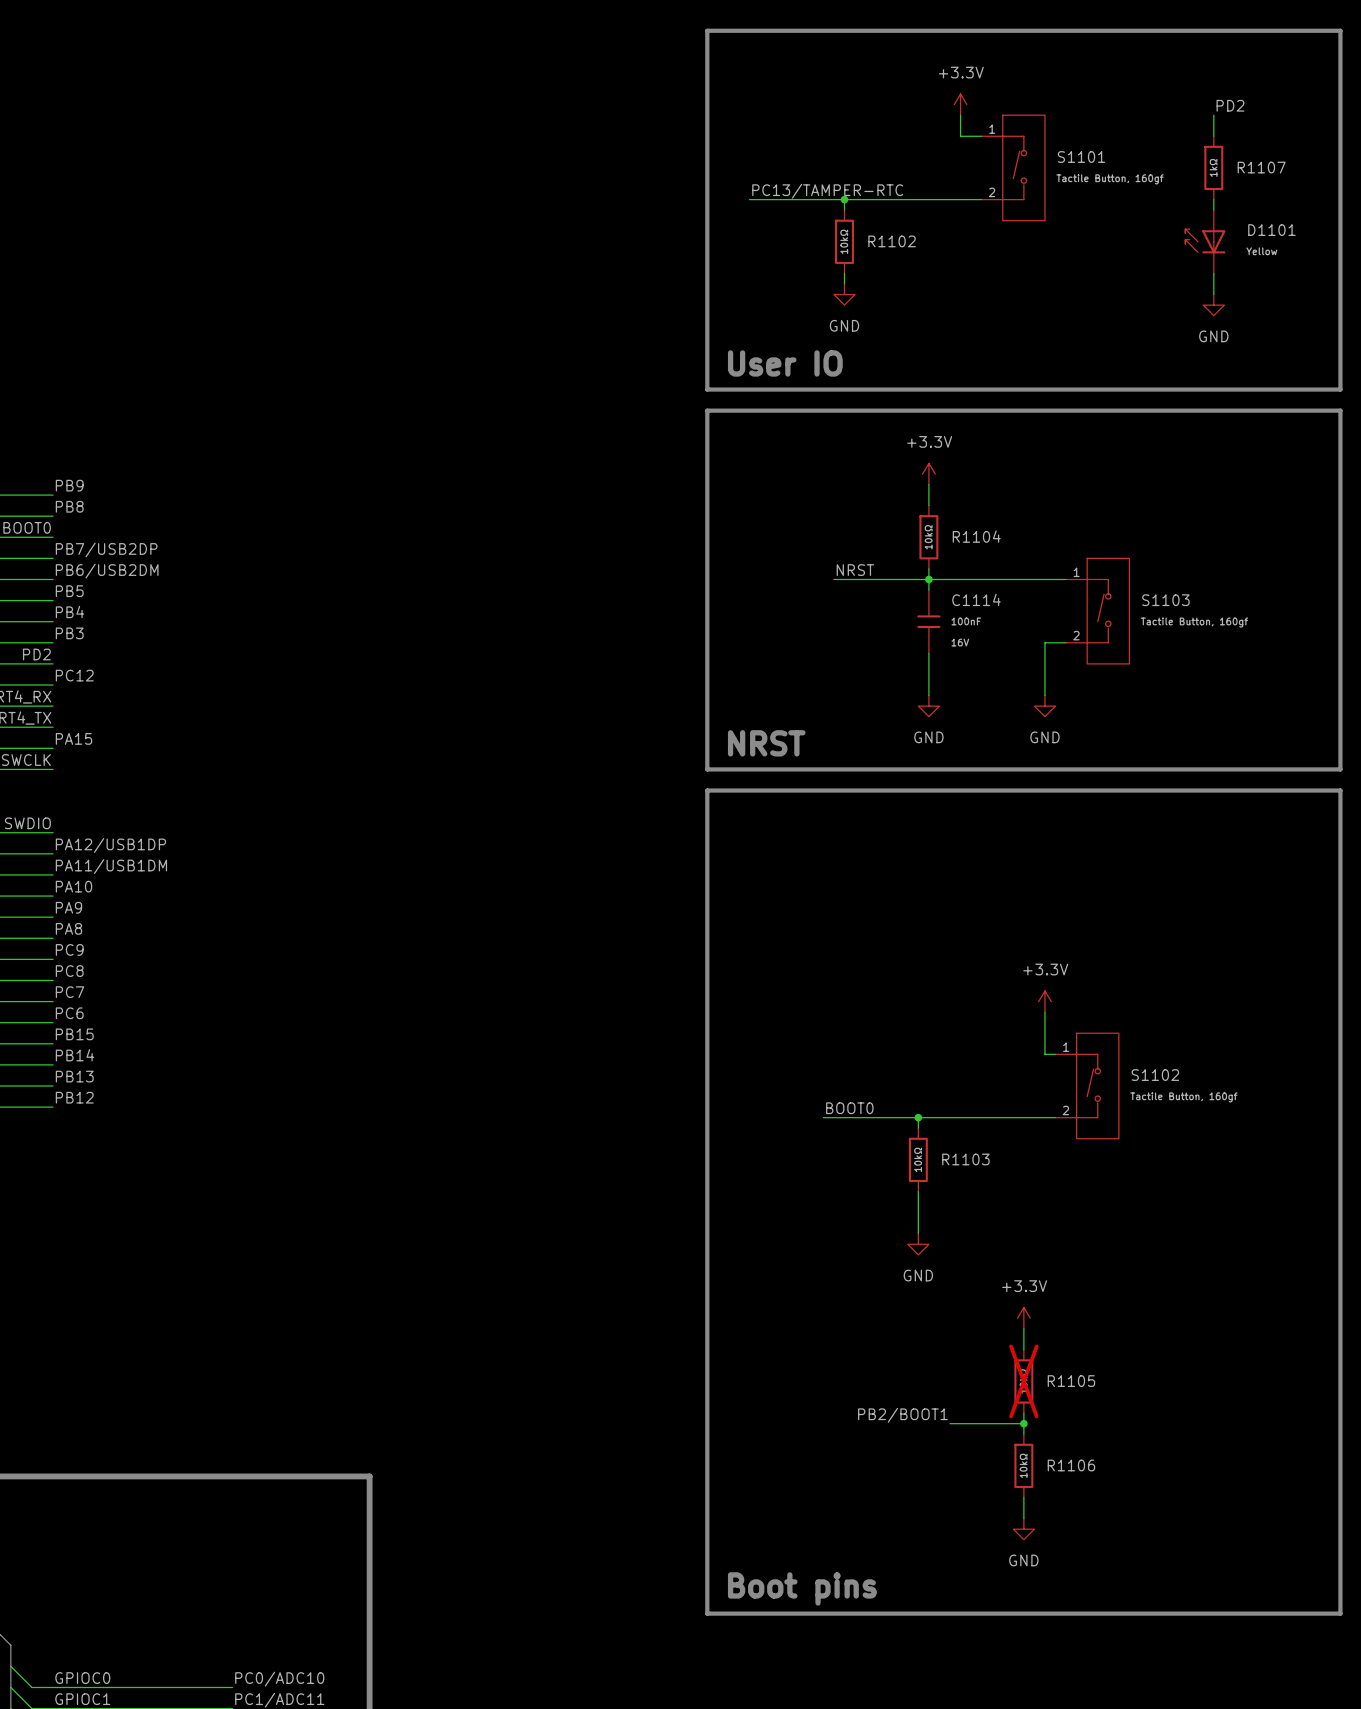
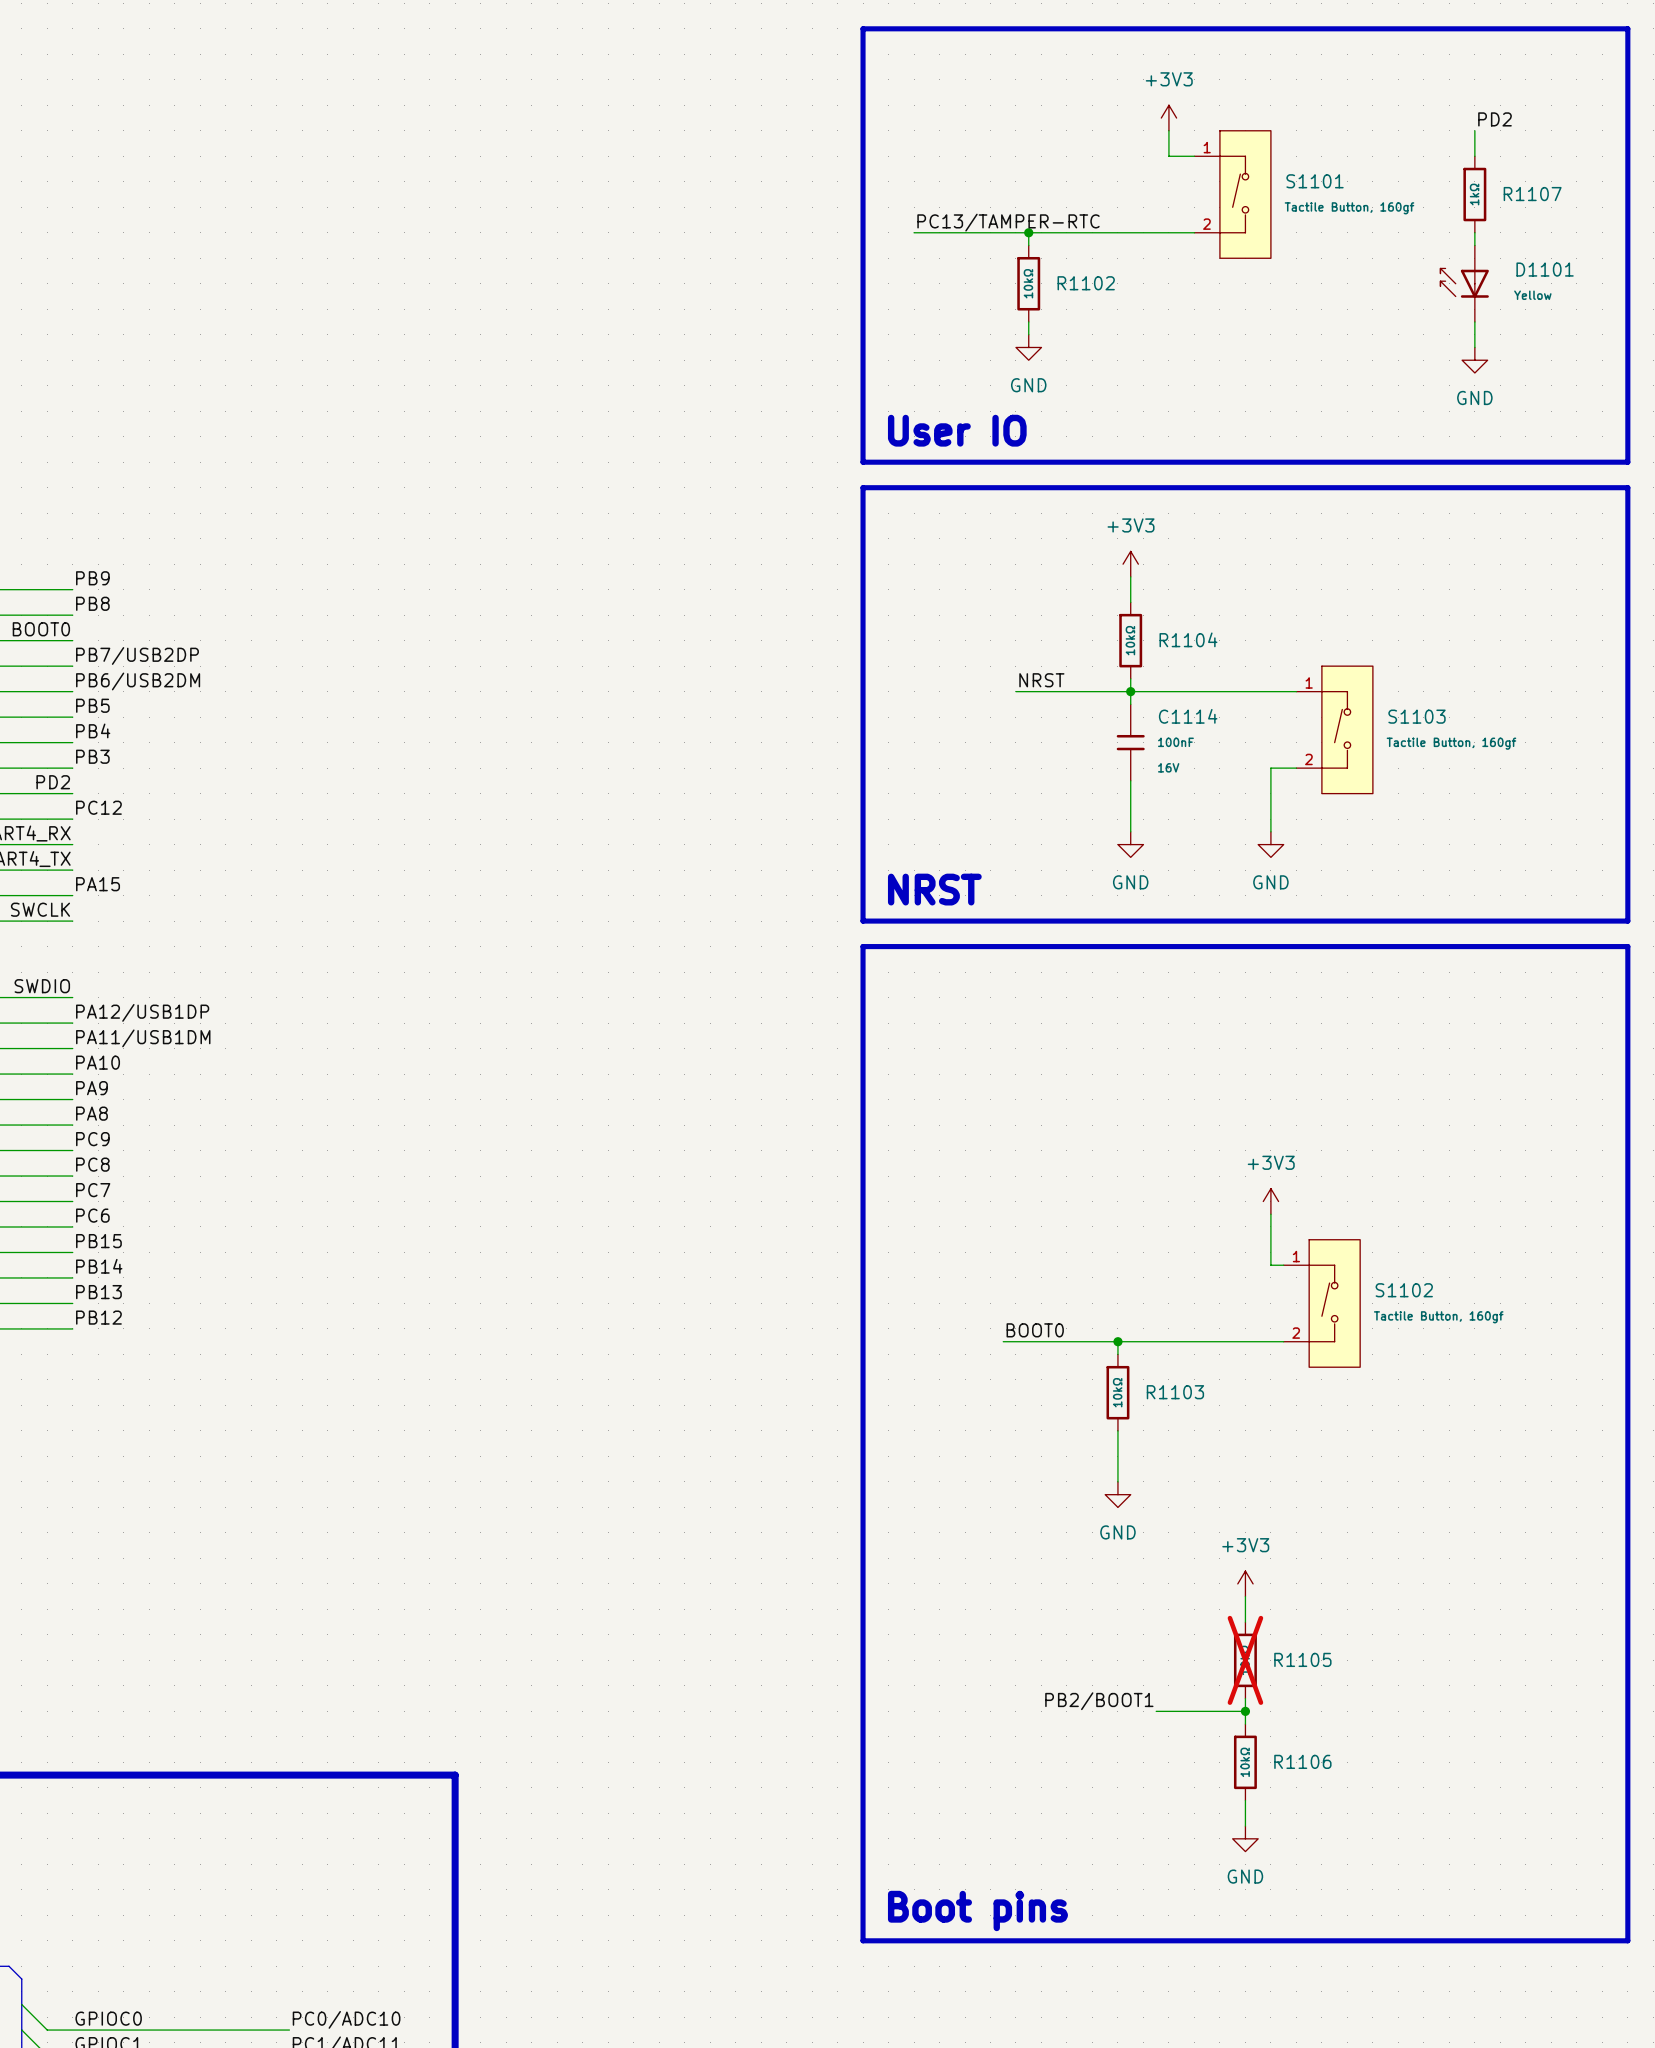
power symbol: +3.3V (960, 104) -> +3V3 (1168, 118)
power symbol: +3.3V (928, 473) -> +3V3 (1130, 564)
power symbol: +3.3V (1044, 1001) -> +3V3 (1270, 1201)
power symbol: +3.3V (1023, 1318) -> +3V3 (1245, 1583)

